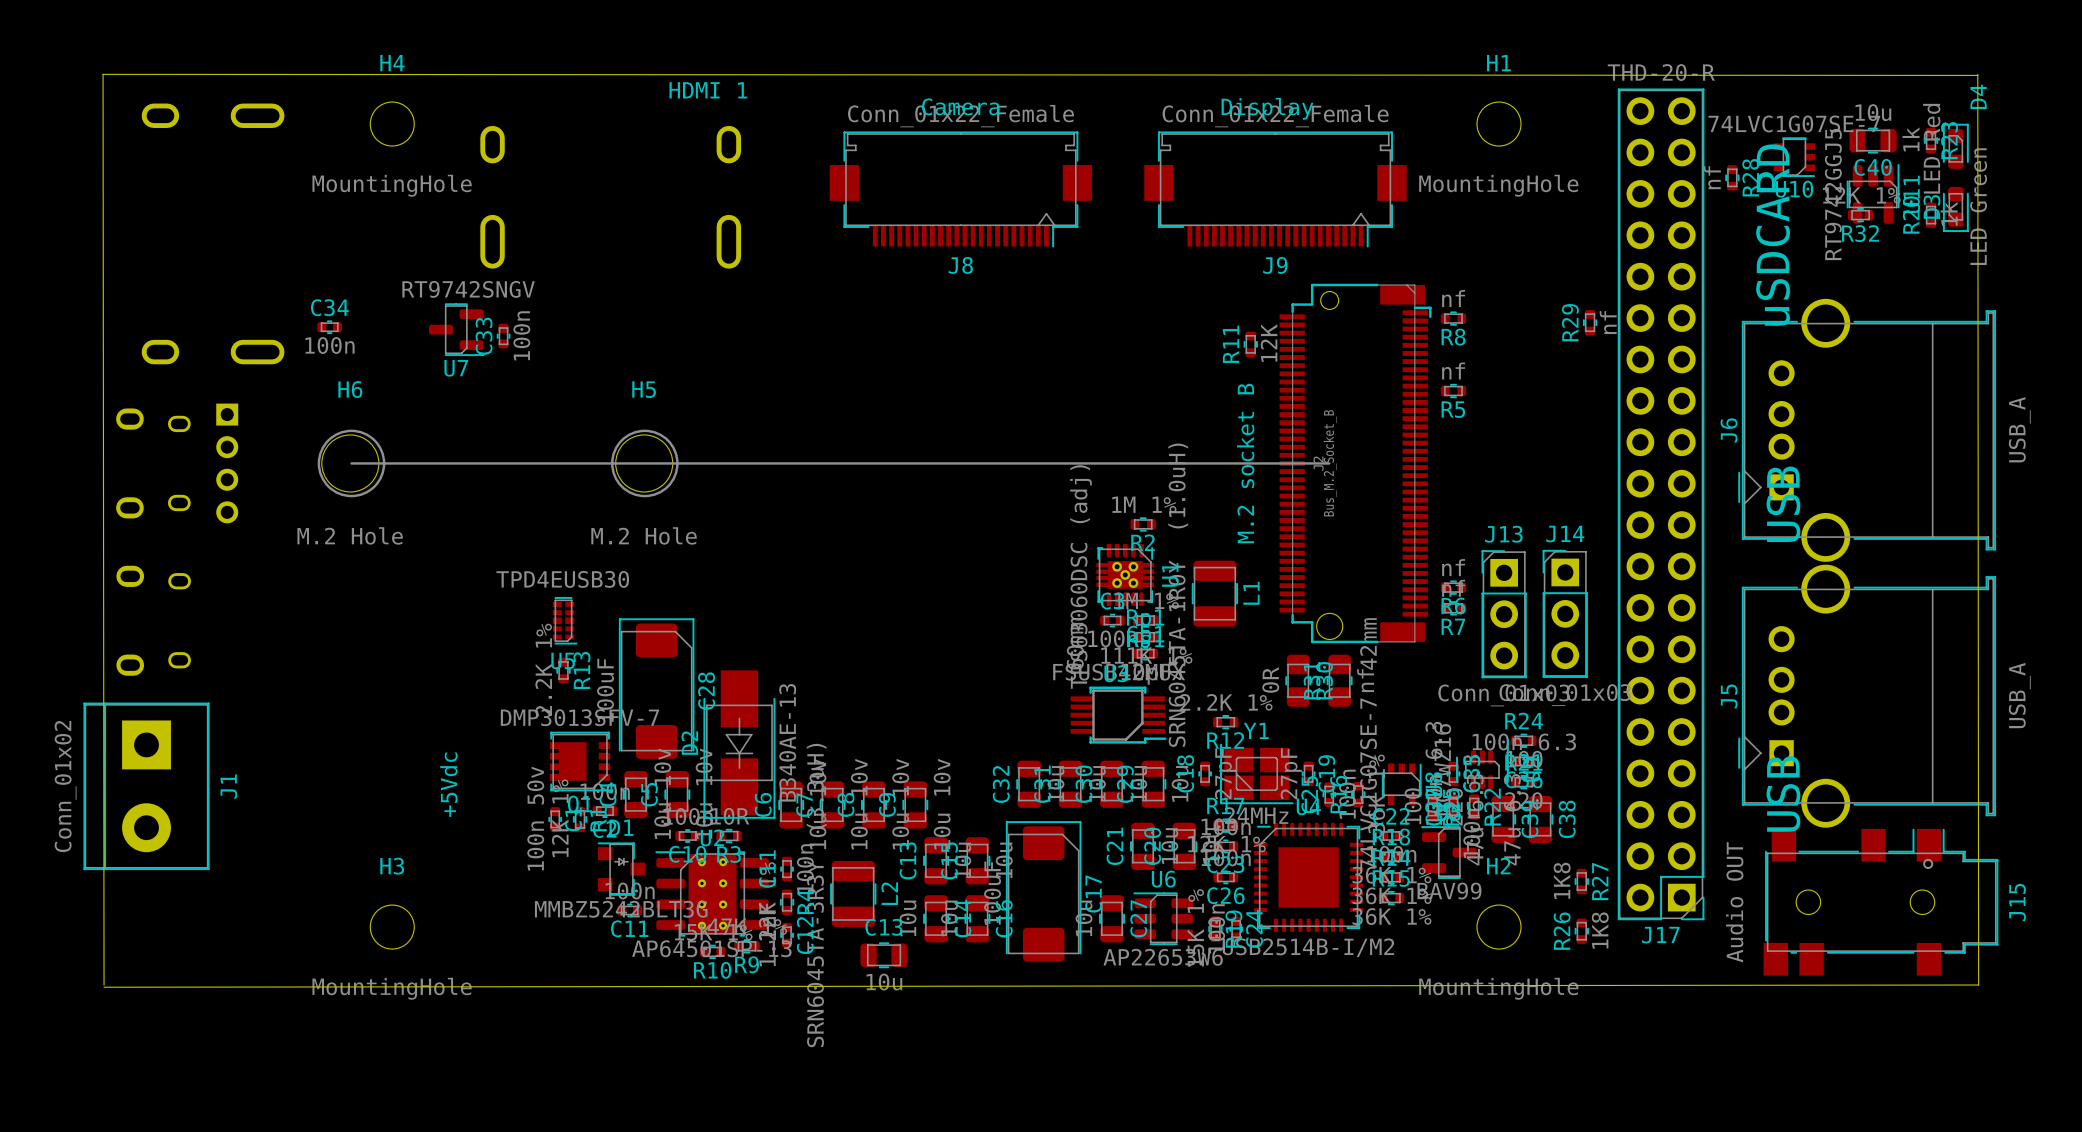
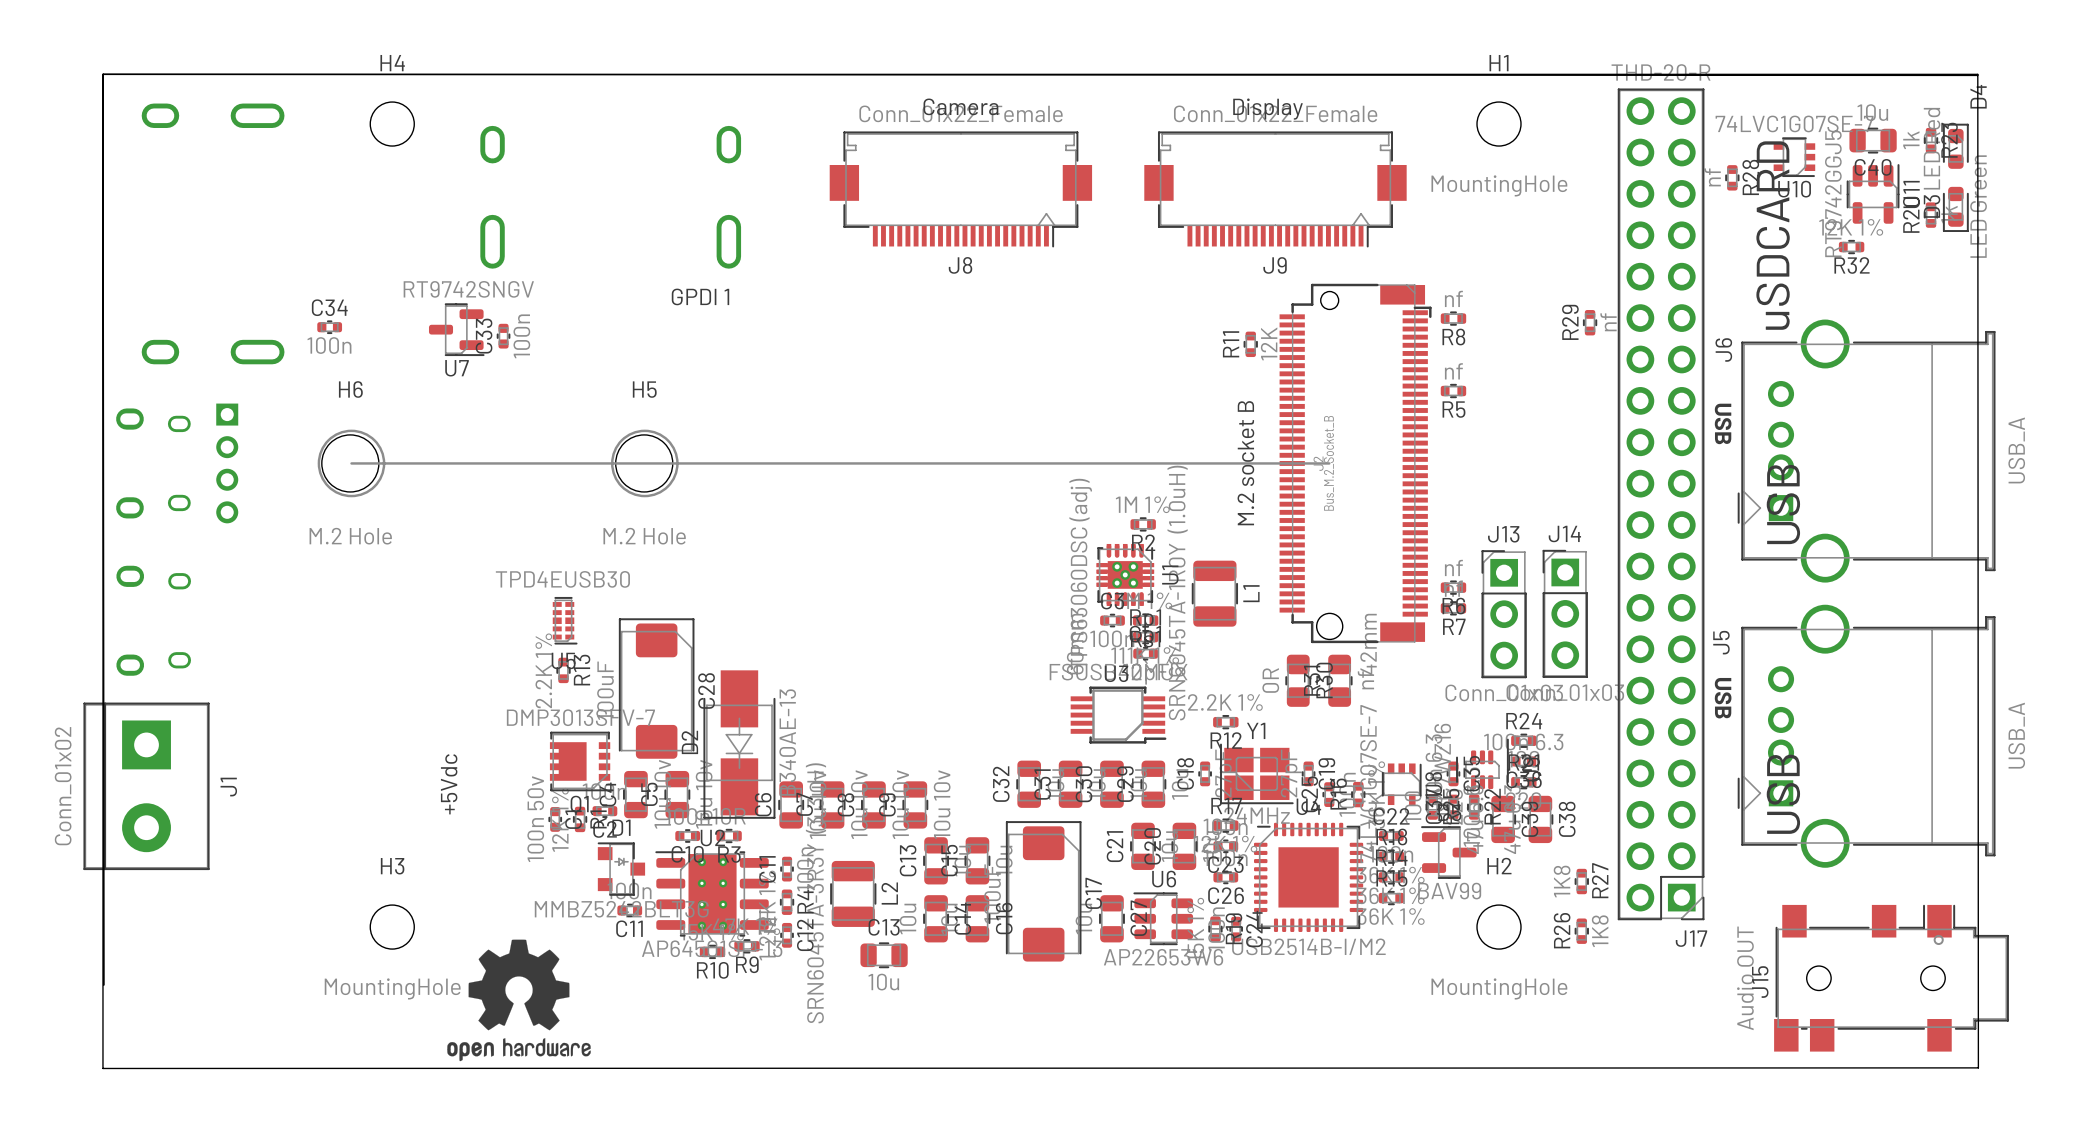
board edge: none -> (103, 74) (1977, 74) (1978, 1067) (102, 1068) (103, 74)
board edge: (1977, 74) (1978, 985) (104, 987) -> none
text: HDMI 1 (708, 90) -> none
H4 value: MountingHole (392, 185) -> none
R32 position: (1860, 215) -> (1851, 247)
text: none -> GPDI 1 (700, 296)
text: none -> USB (1723, 423)
J6 name position: J6 (1729, 430) -> J6 (1723, 349)
J6 position: (1867, 430) -> (1866, 451)
J5 name position: J5 (1729, 696) -> J5 (1721, 642)
J5 position: (1867, 696) -> (1866, 736)
text: none -> USB (1723, 698)
J15 position: (1880, 902) -> (1891, 978)
J15 name position: J15 (2017, 902) -> J15 (1760, 982)
J17 name position: J17 (1660, 935) -> J17 (1691, 938)
drawing: none -> [447, 939, 591, 1062]

